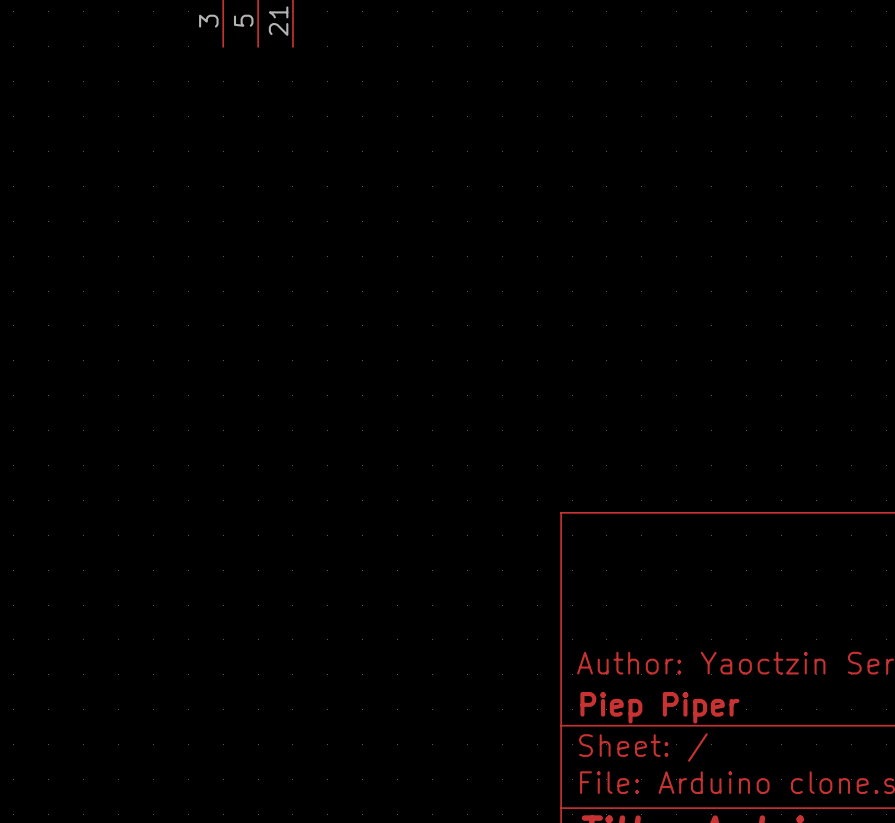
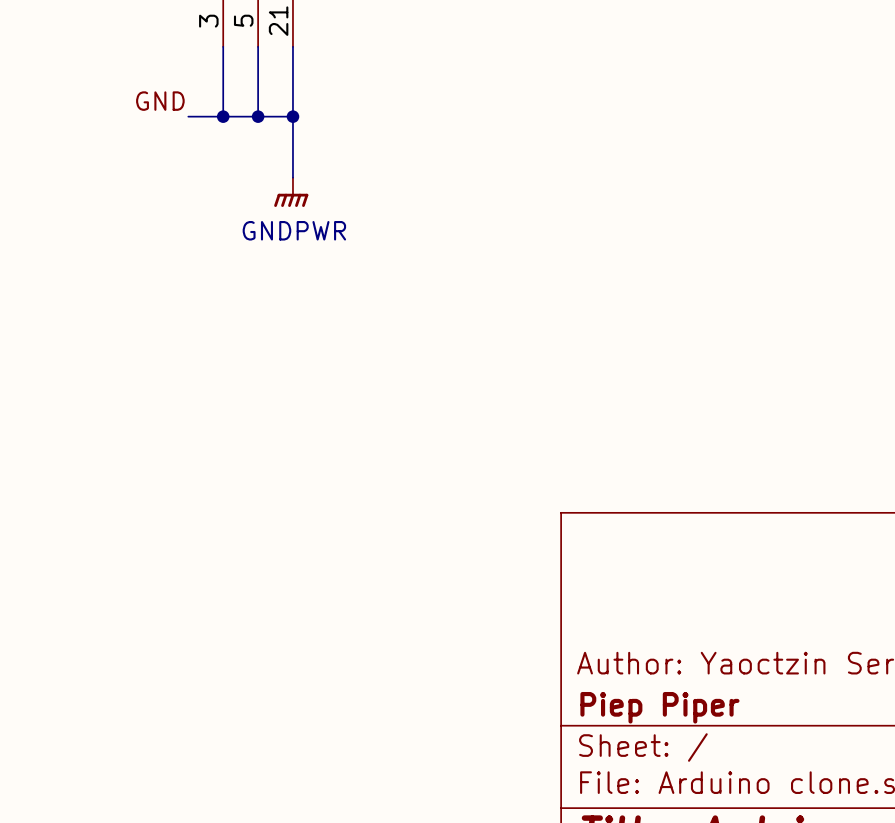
wire: none -> (223, 46) (223, 116)
wire: none -> (258, 46) (258, 116)
wire: none -> (292, 46) (292, 177)
label: none -> GND (160, 101)
wire: none -> (188, 116) (292, 116)
junction: none -> (223, 116)
junction: none -> (258, 116)
junction: none -> (292, 116)
power symbol: none -> GNDPWR (291, 192)

